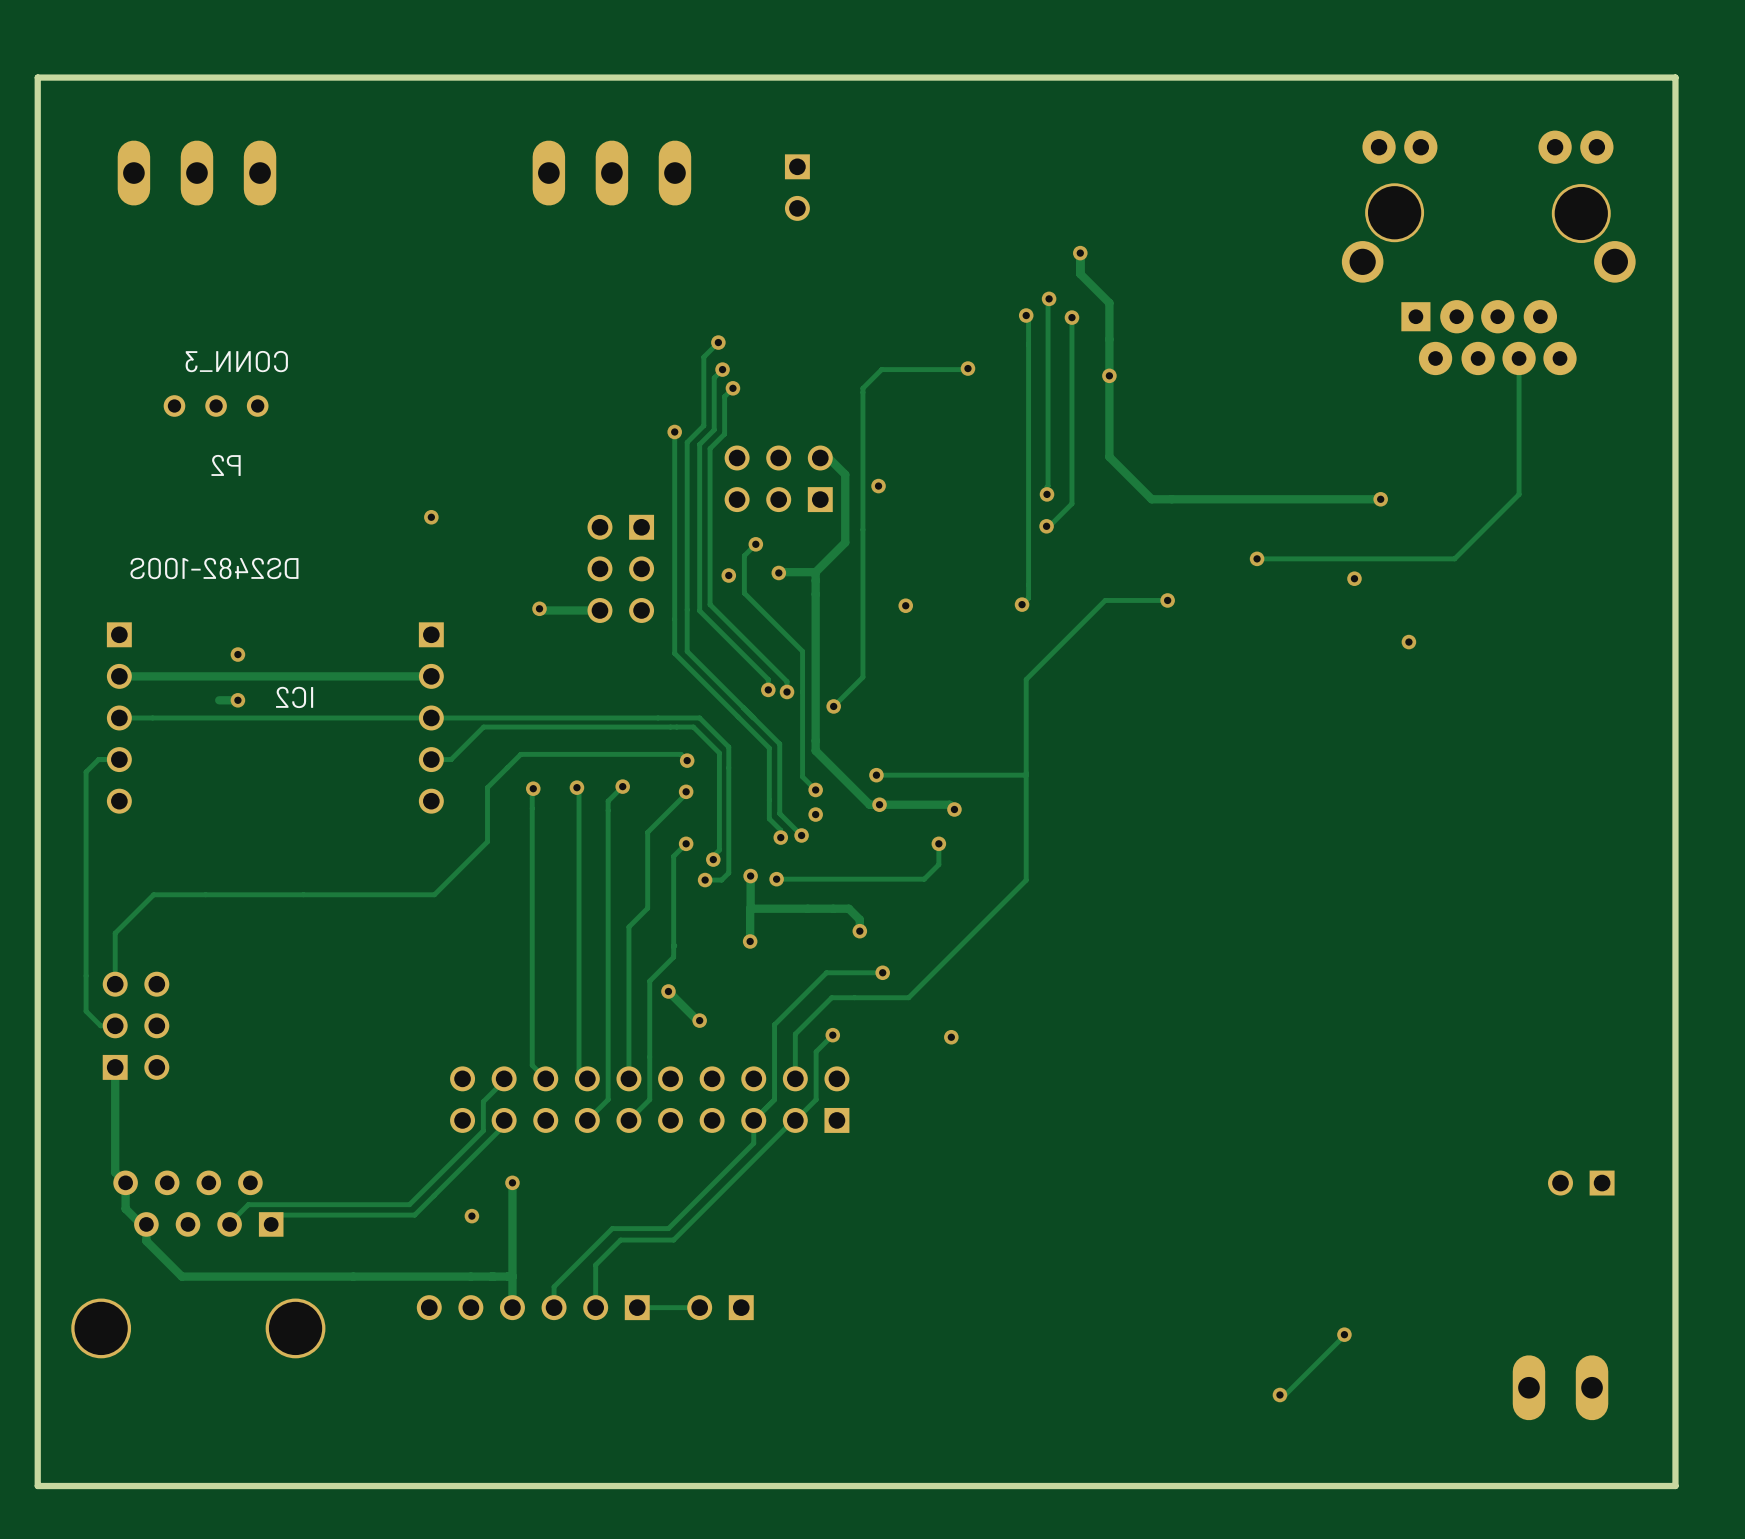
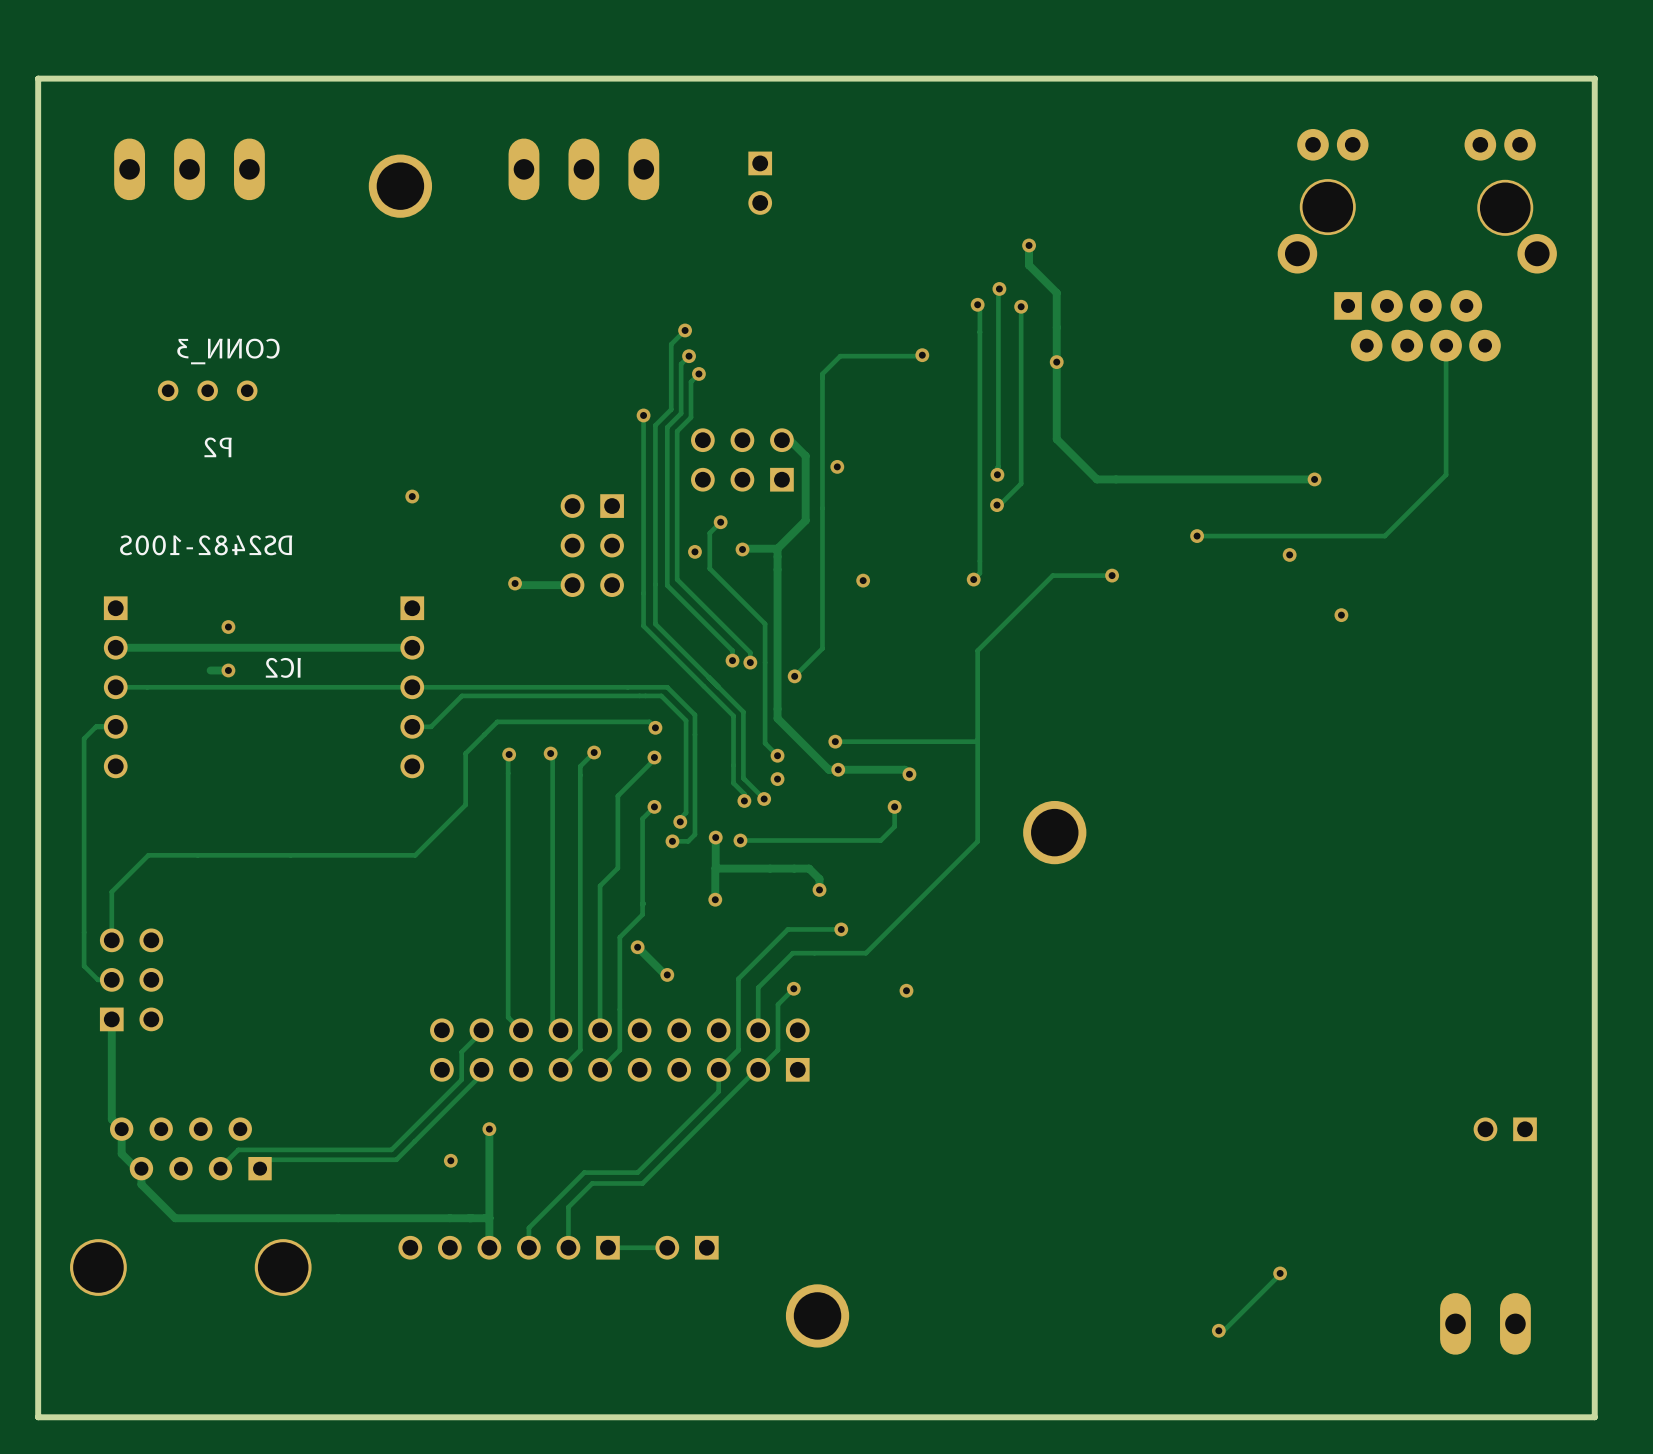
part: none -> (400, 186)
part: none -> (1054, 832)
part: none -> (817, 1315)

